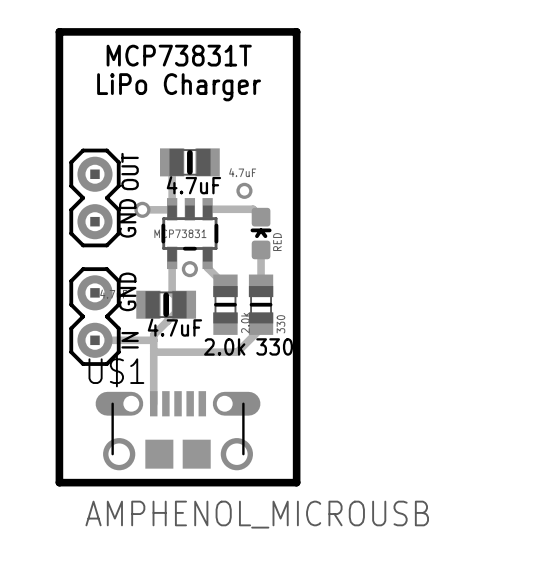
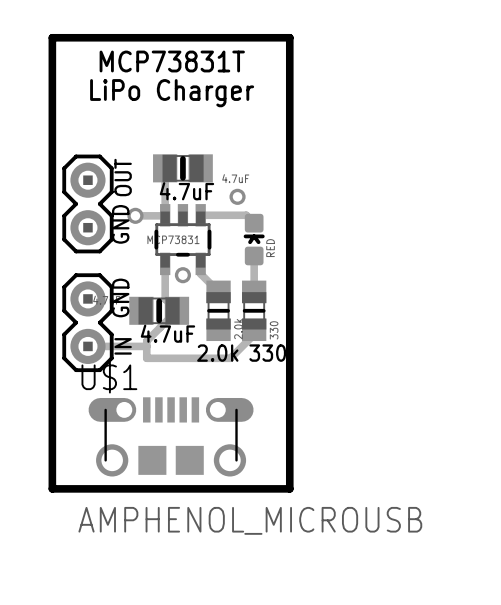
track: (154, 352) (153, 403) -> none

